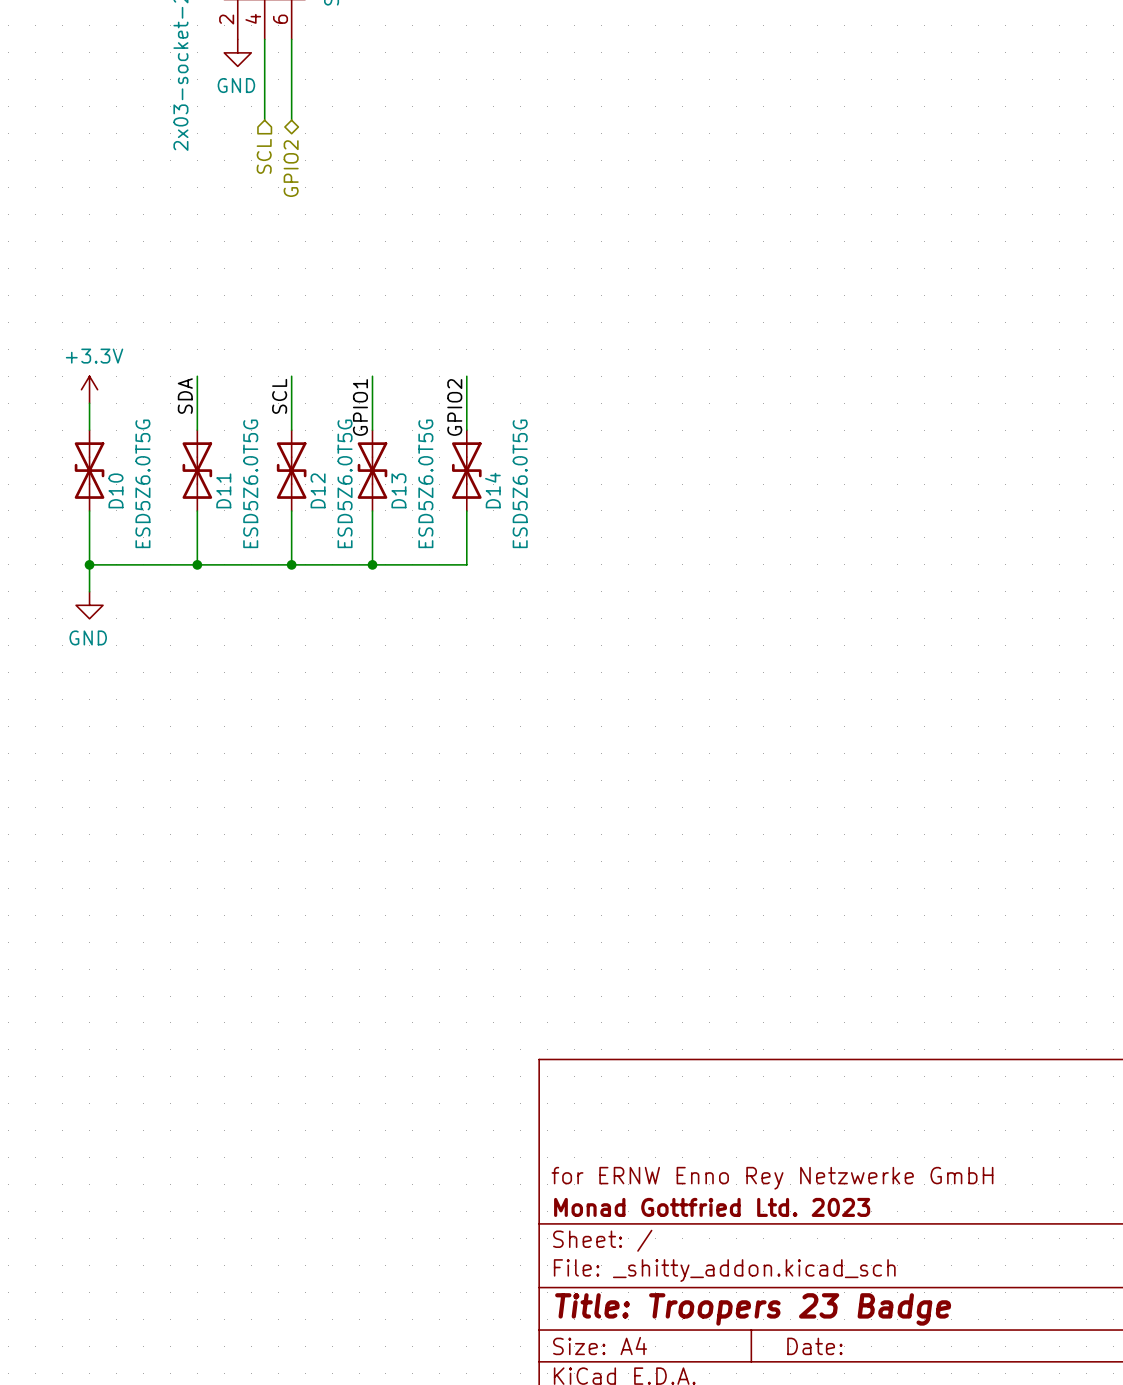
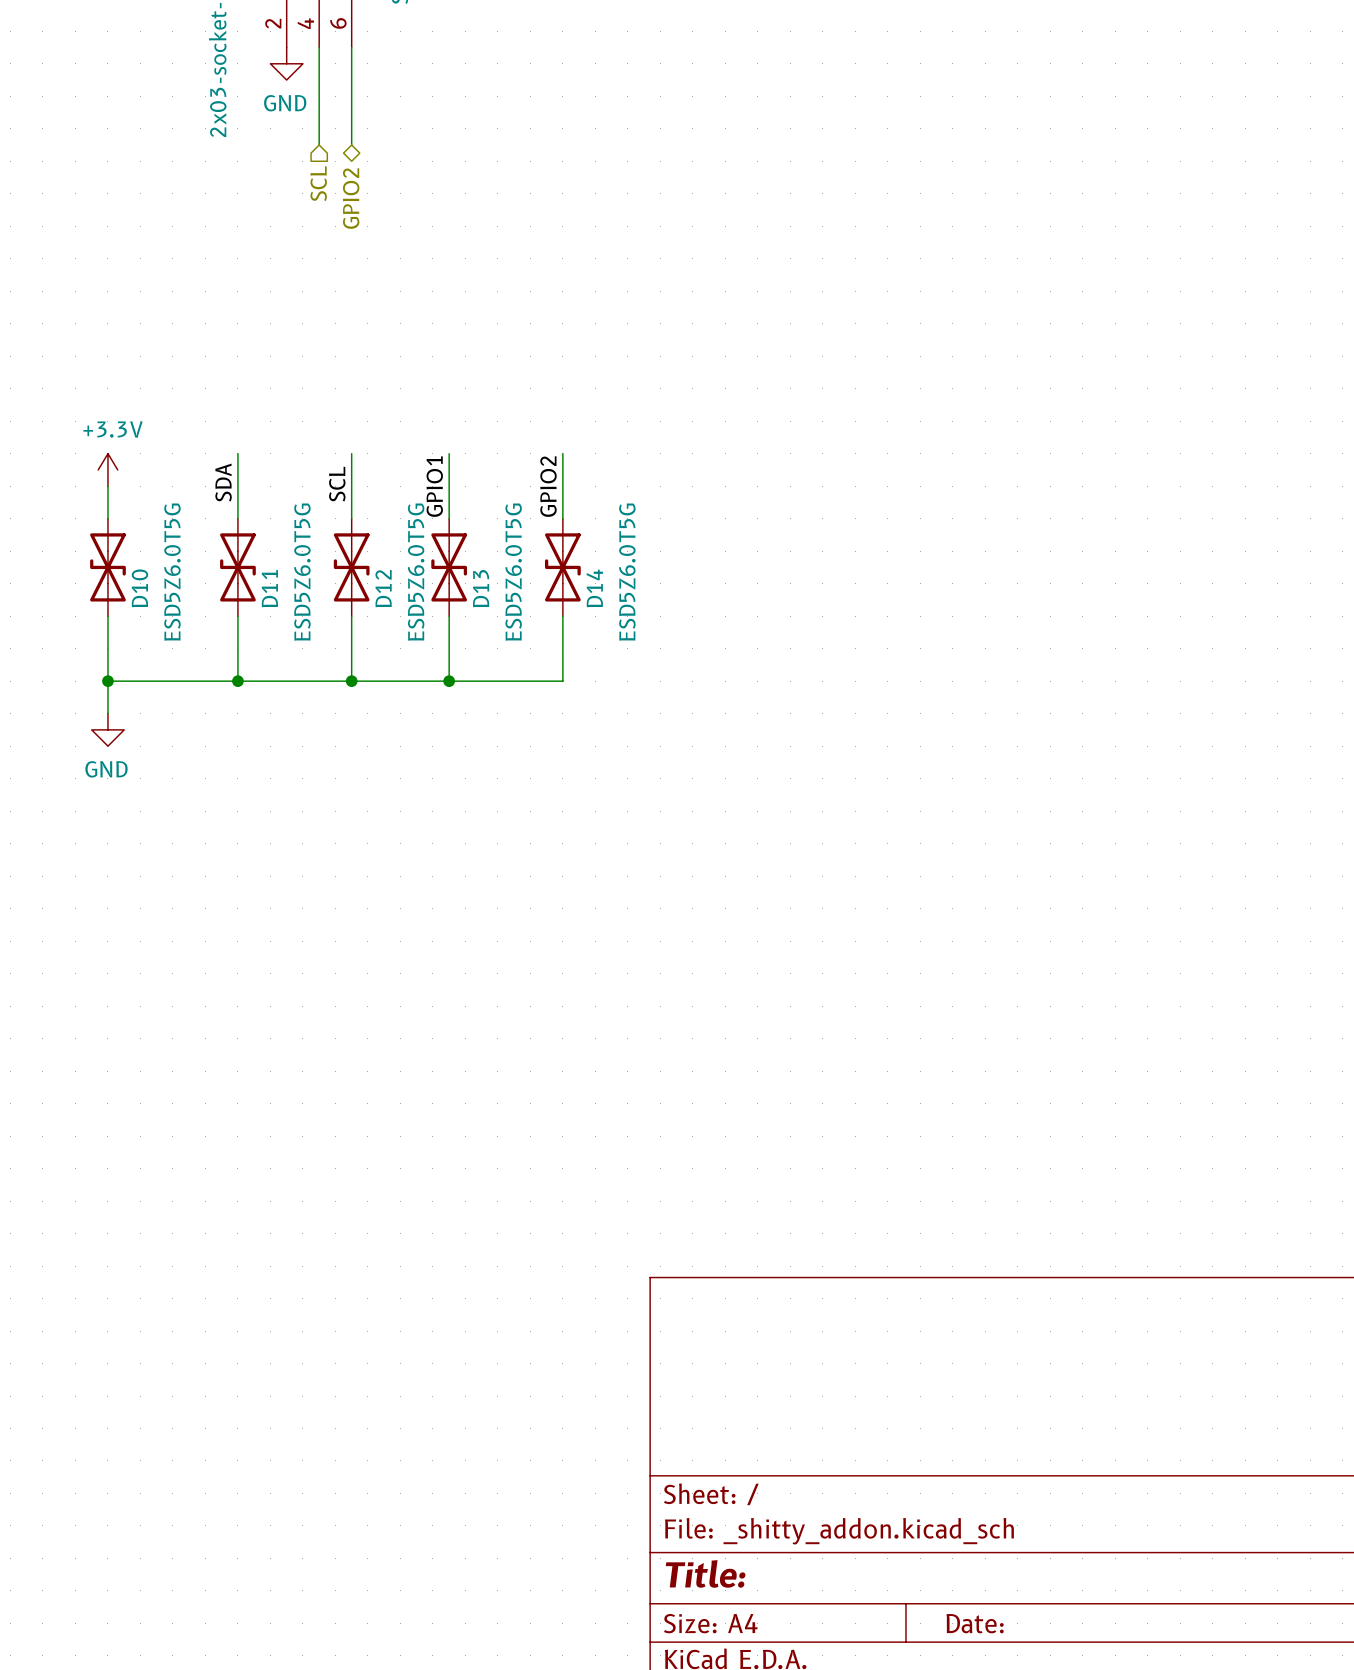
title block: for ERNW Enno Rey Netzwerke GmbH (772, 1178) -> none
title block: Monad Gottfried Ltd. 2023 (712, 1207) -> none
title block: Title: Troopers 23 Badge (753, 1309) -> Title: (705, 1573)

